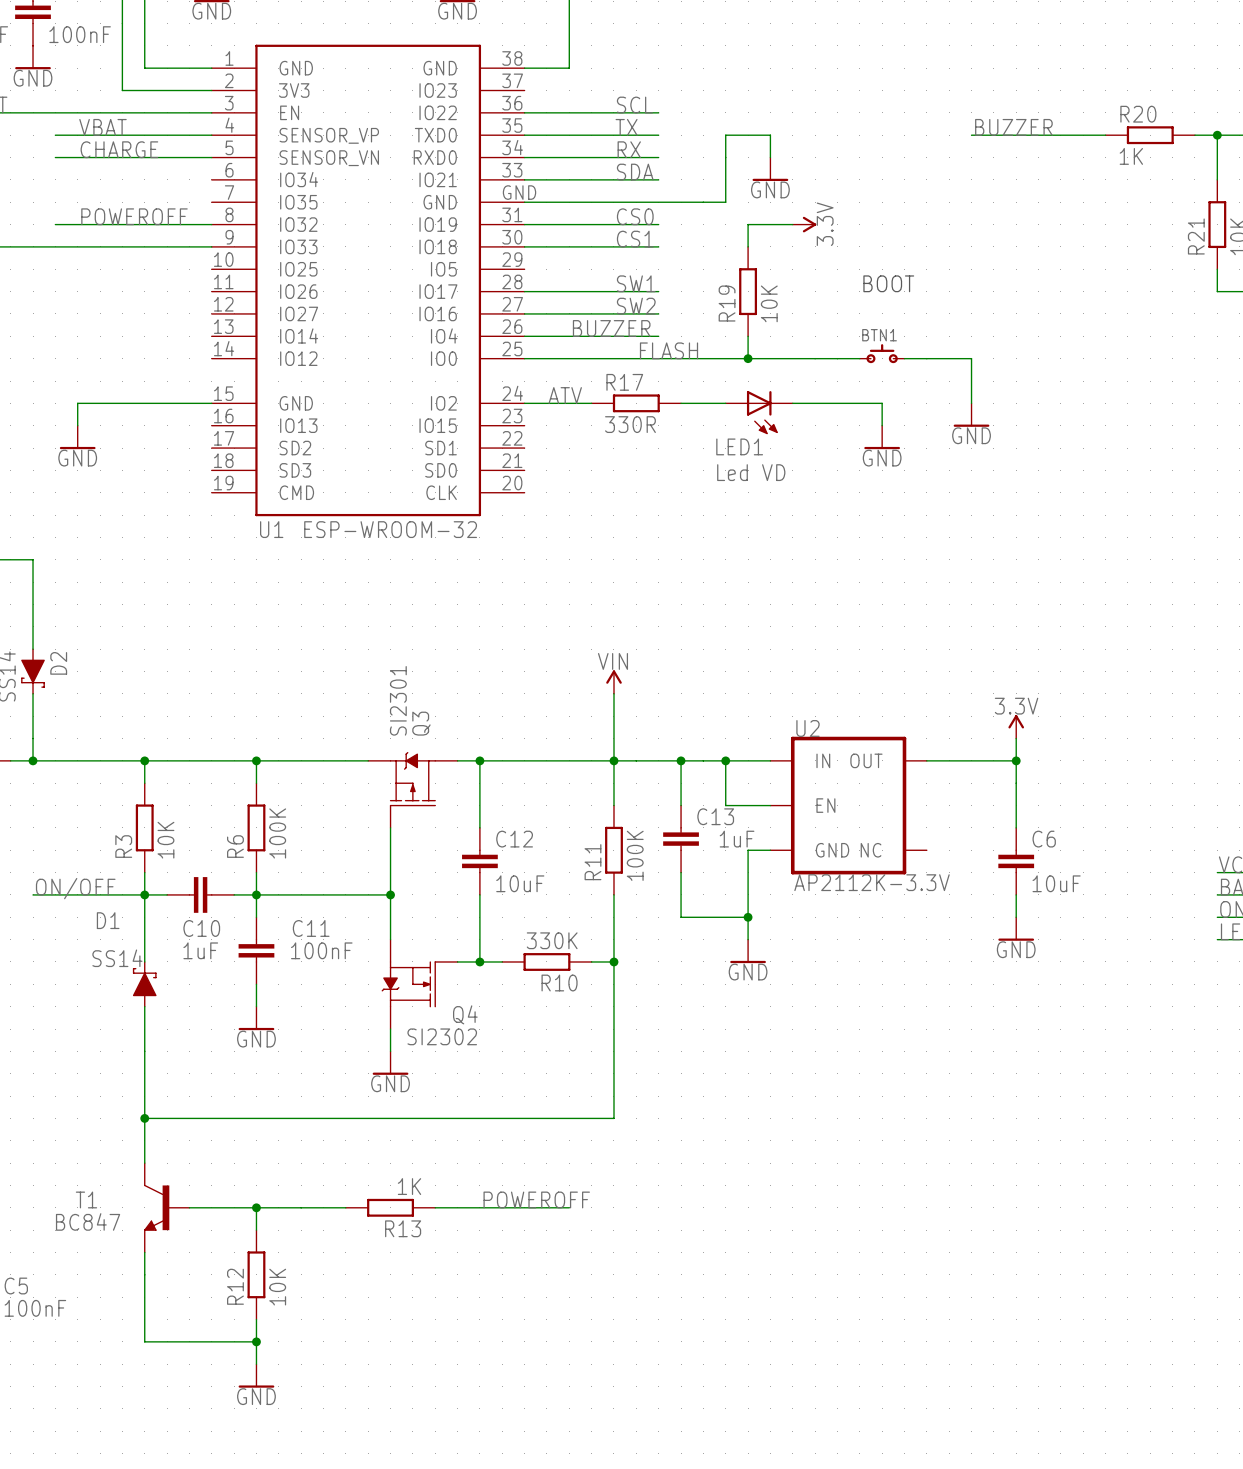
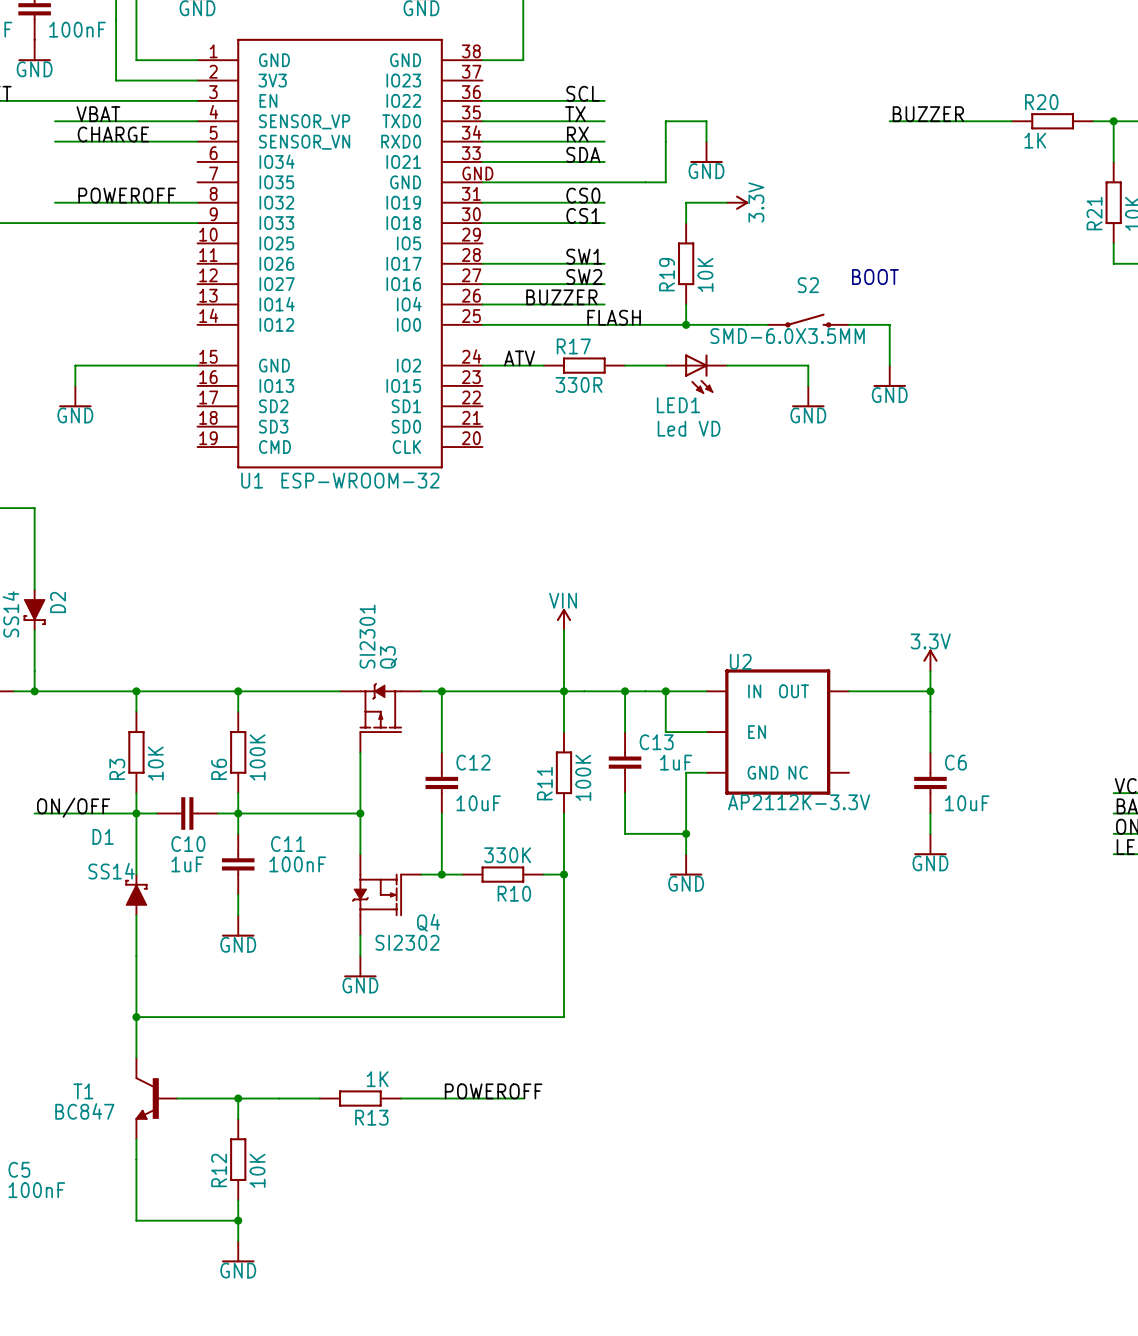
text position: BOOT (888, 283) -> BOOT (875, 277)
BTN1: (882, 353) -> none
S2: none -> SMD-6.0X3.5MM (808, 320)

